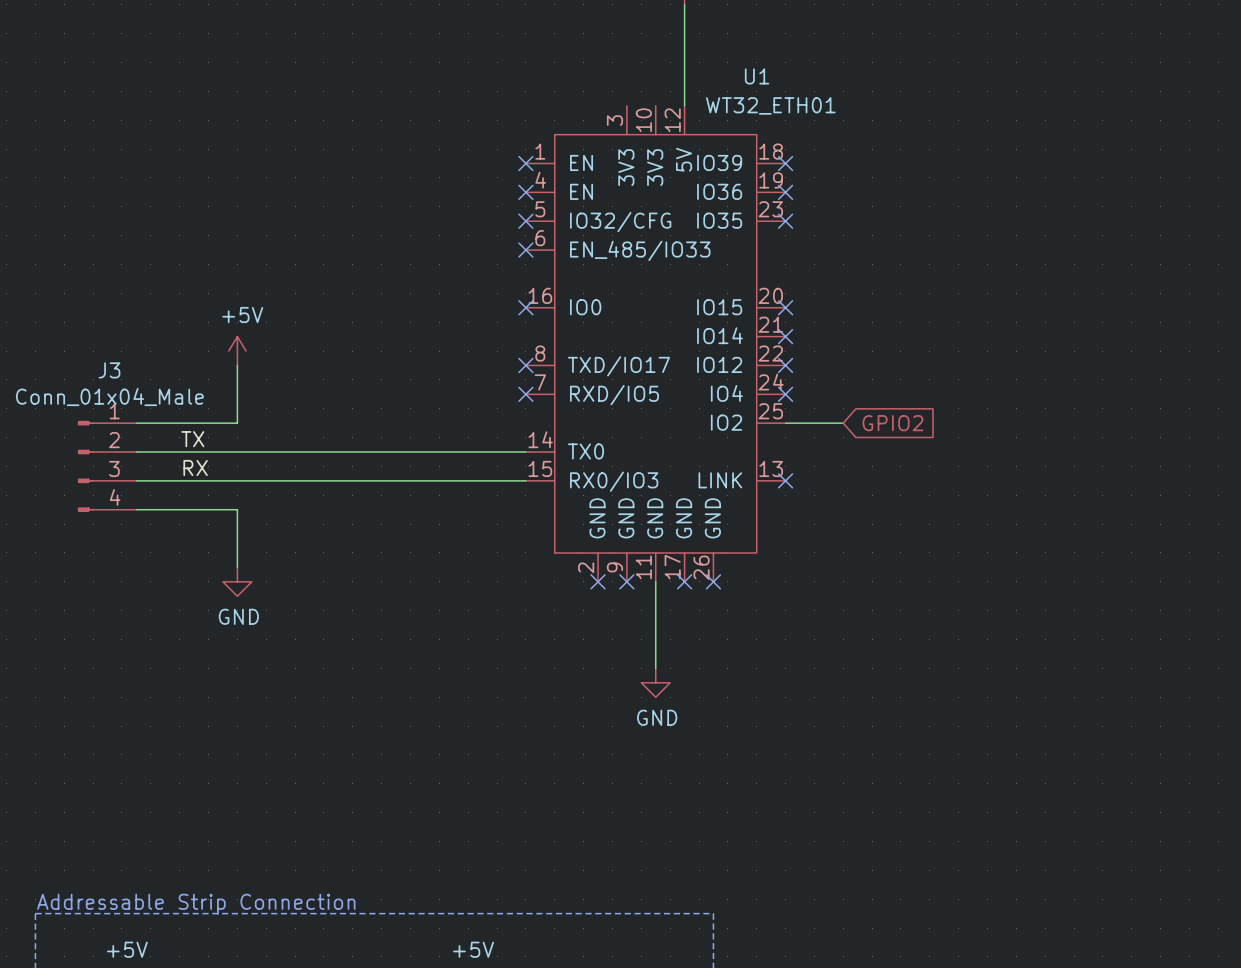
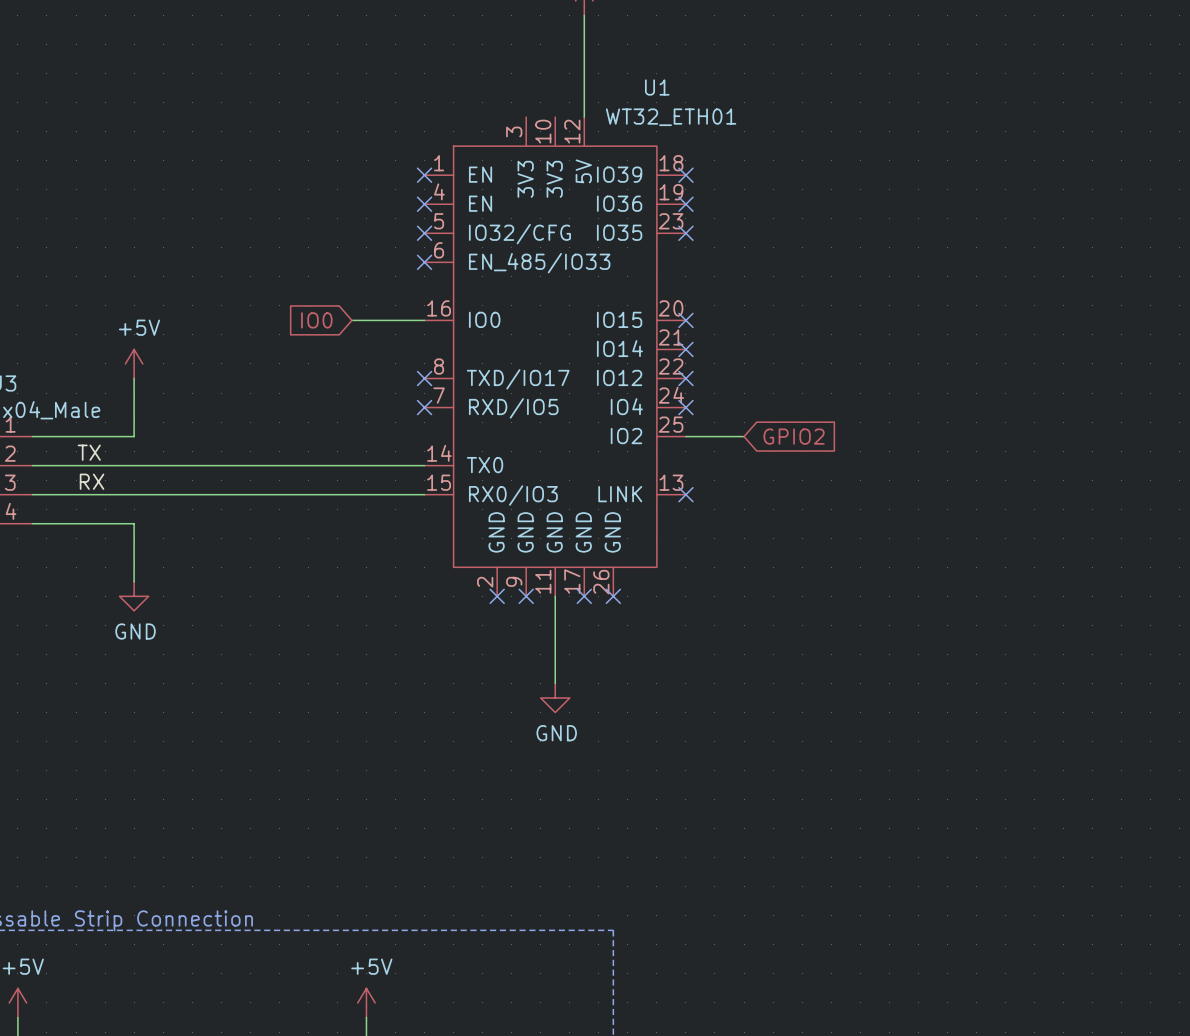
global label: none -> IO0 (316, 320)
wire: none -> (351, 320) (424, 320)
no-connect mark: (525, 307) -> none

